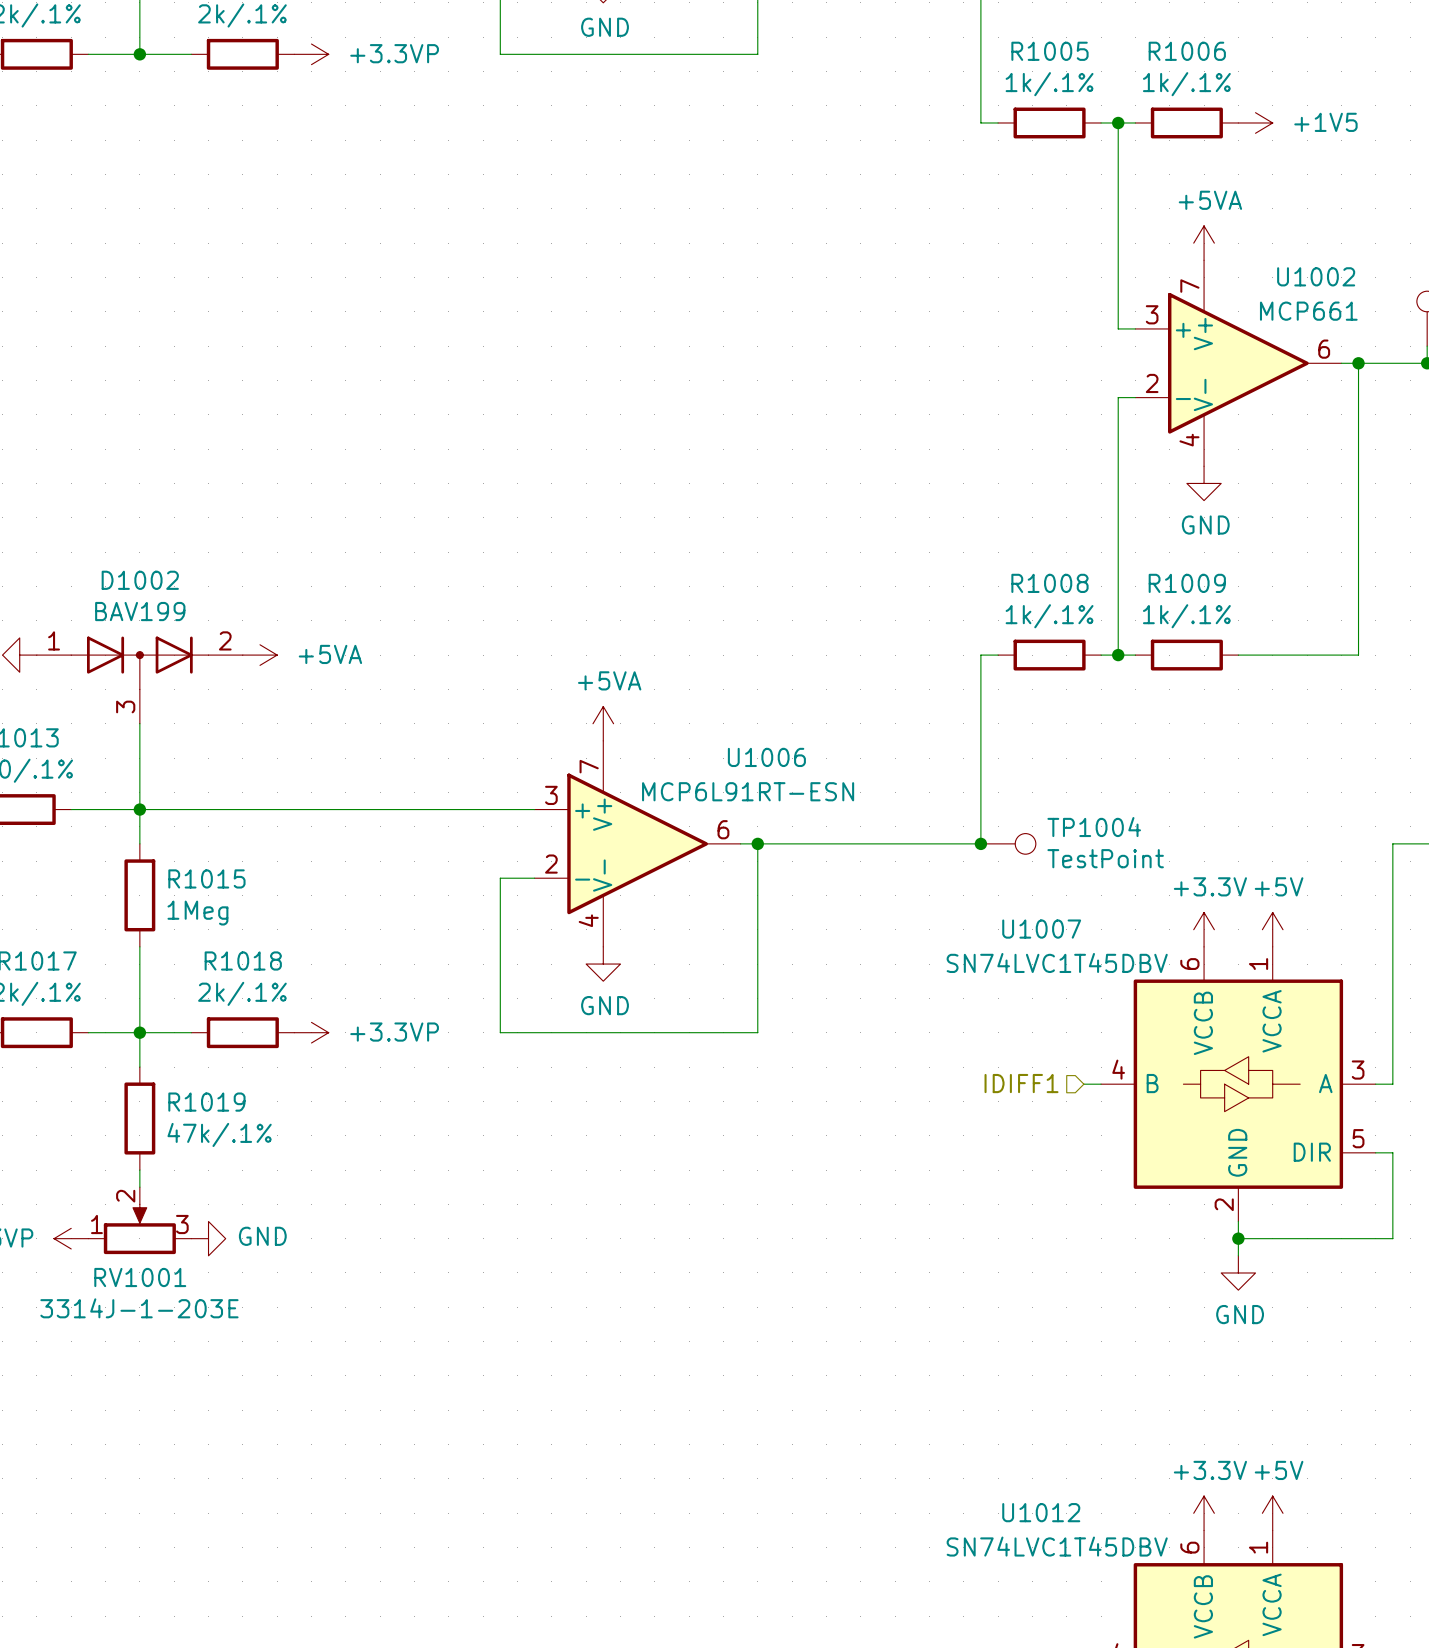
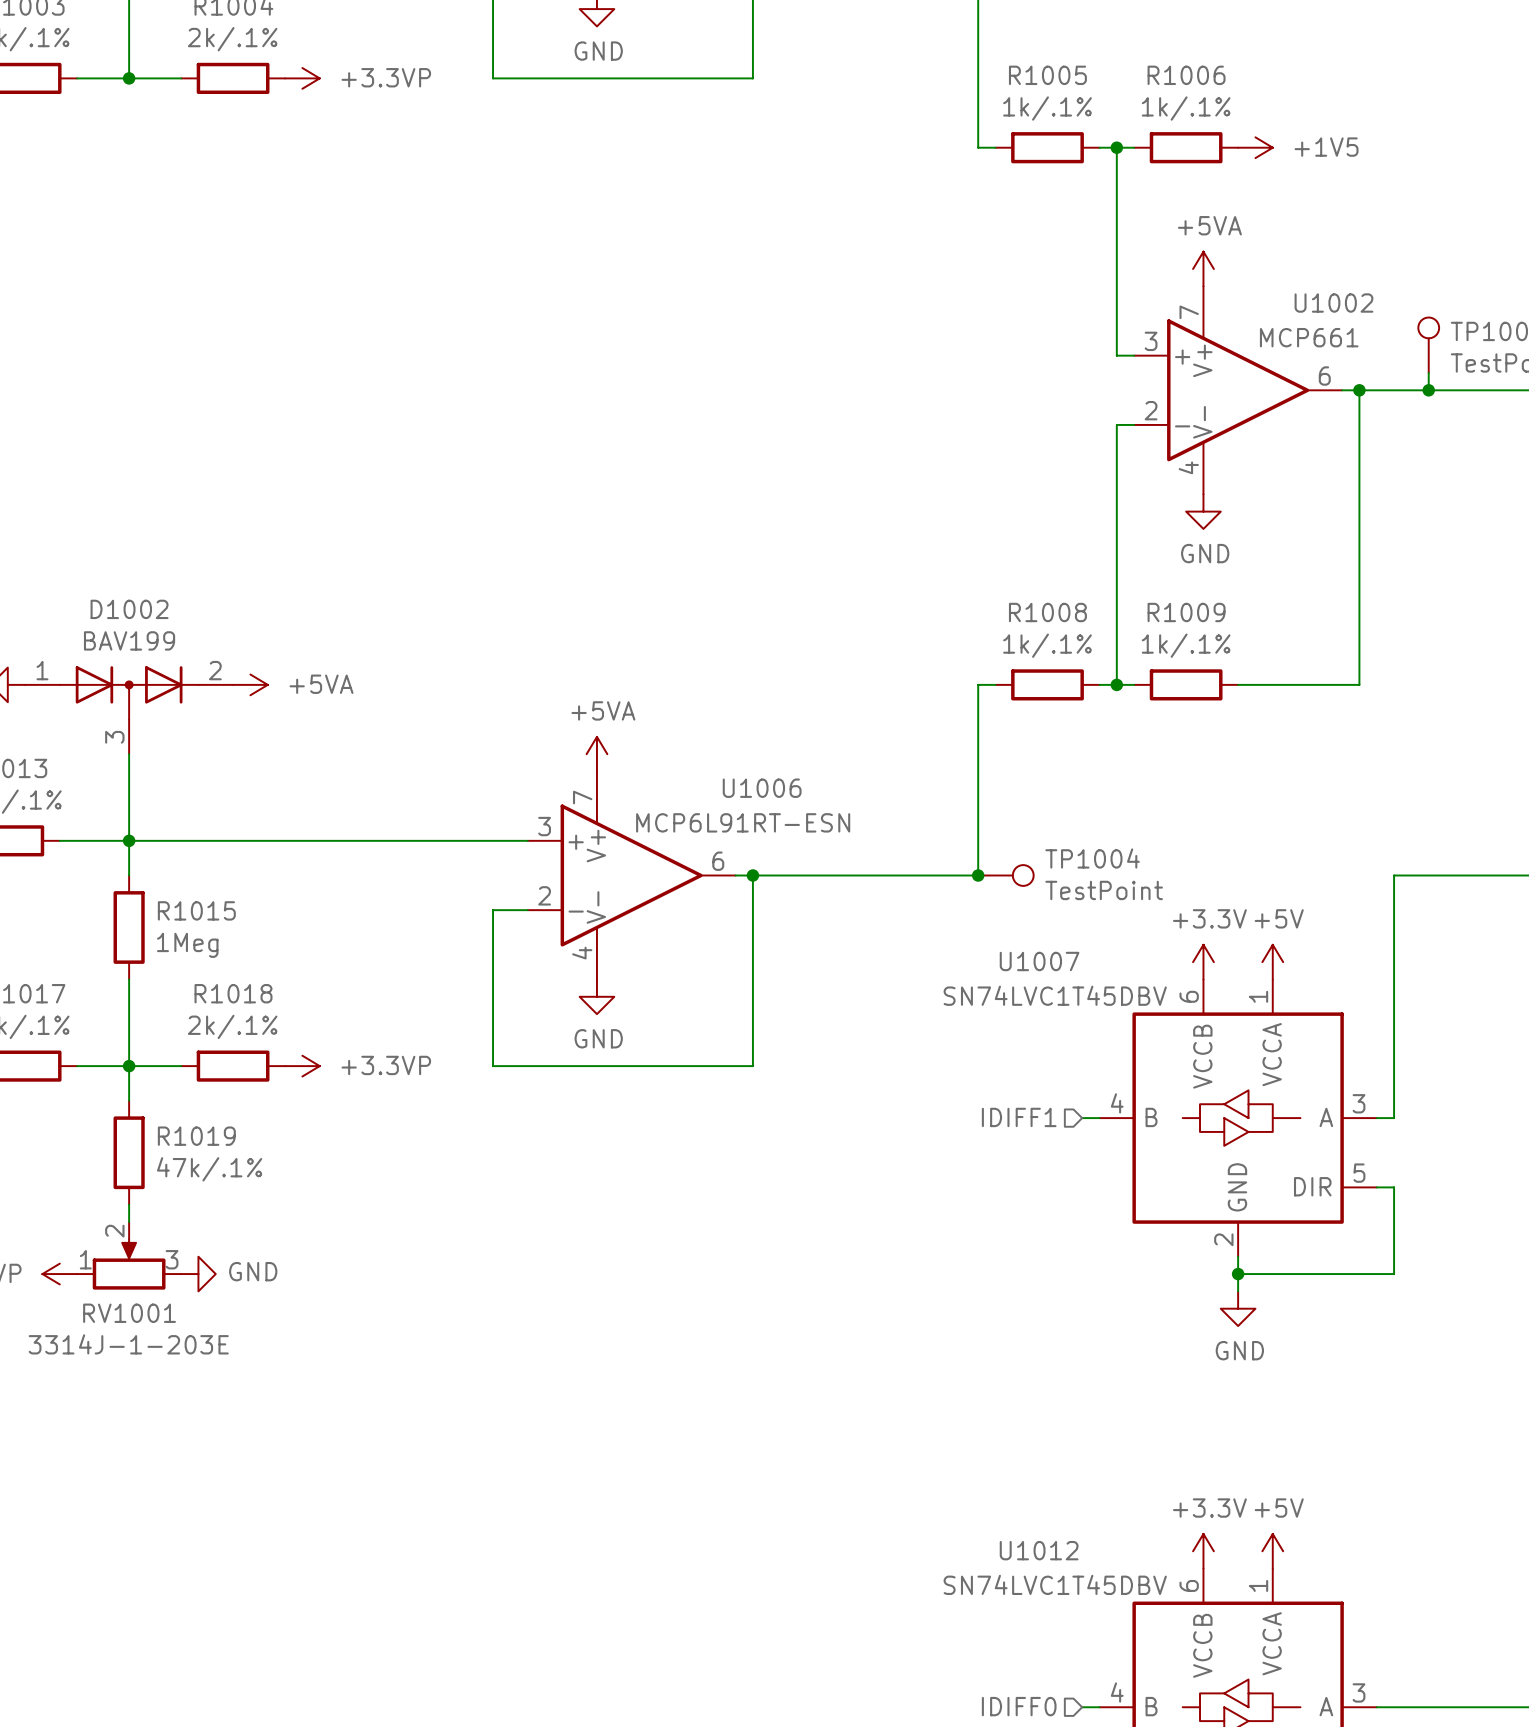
U1002 name position: U1002 (1316, 276) -> U1002 (1333, 303)

